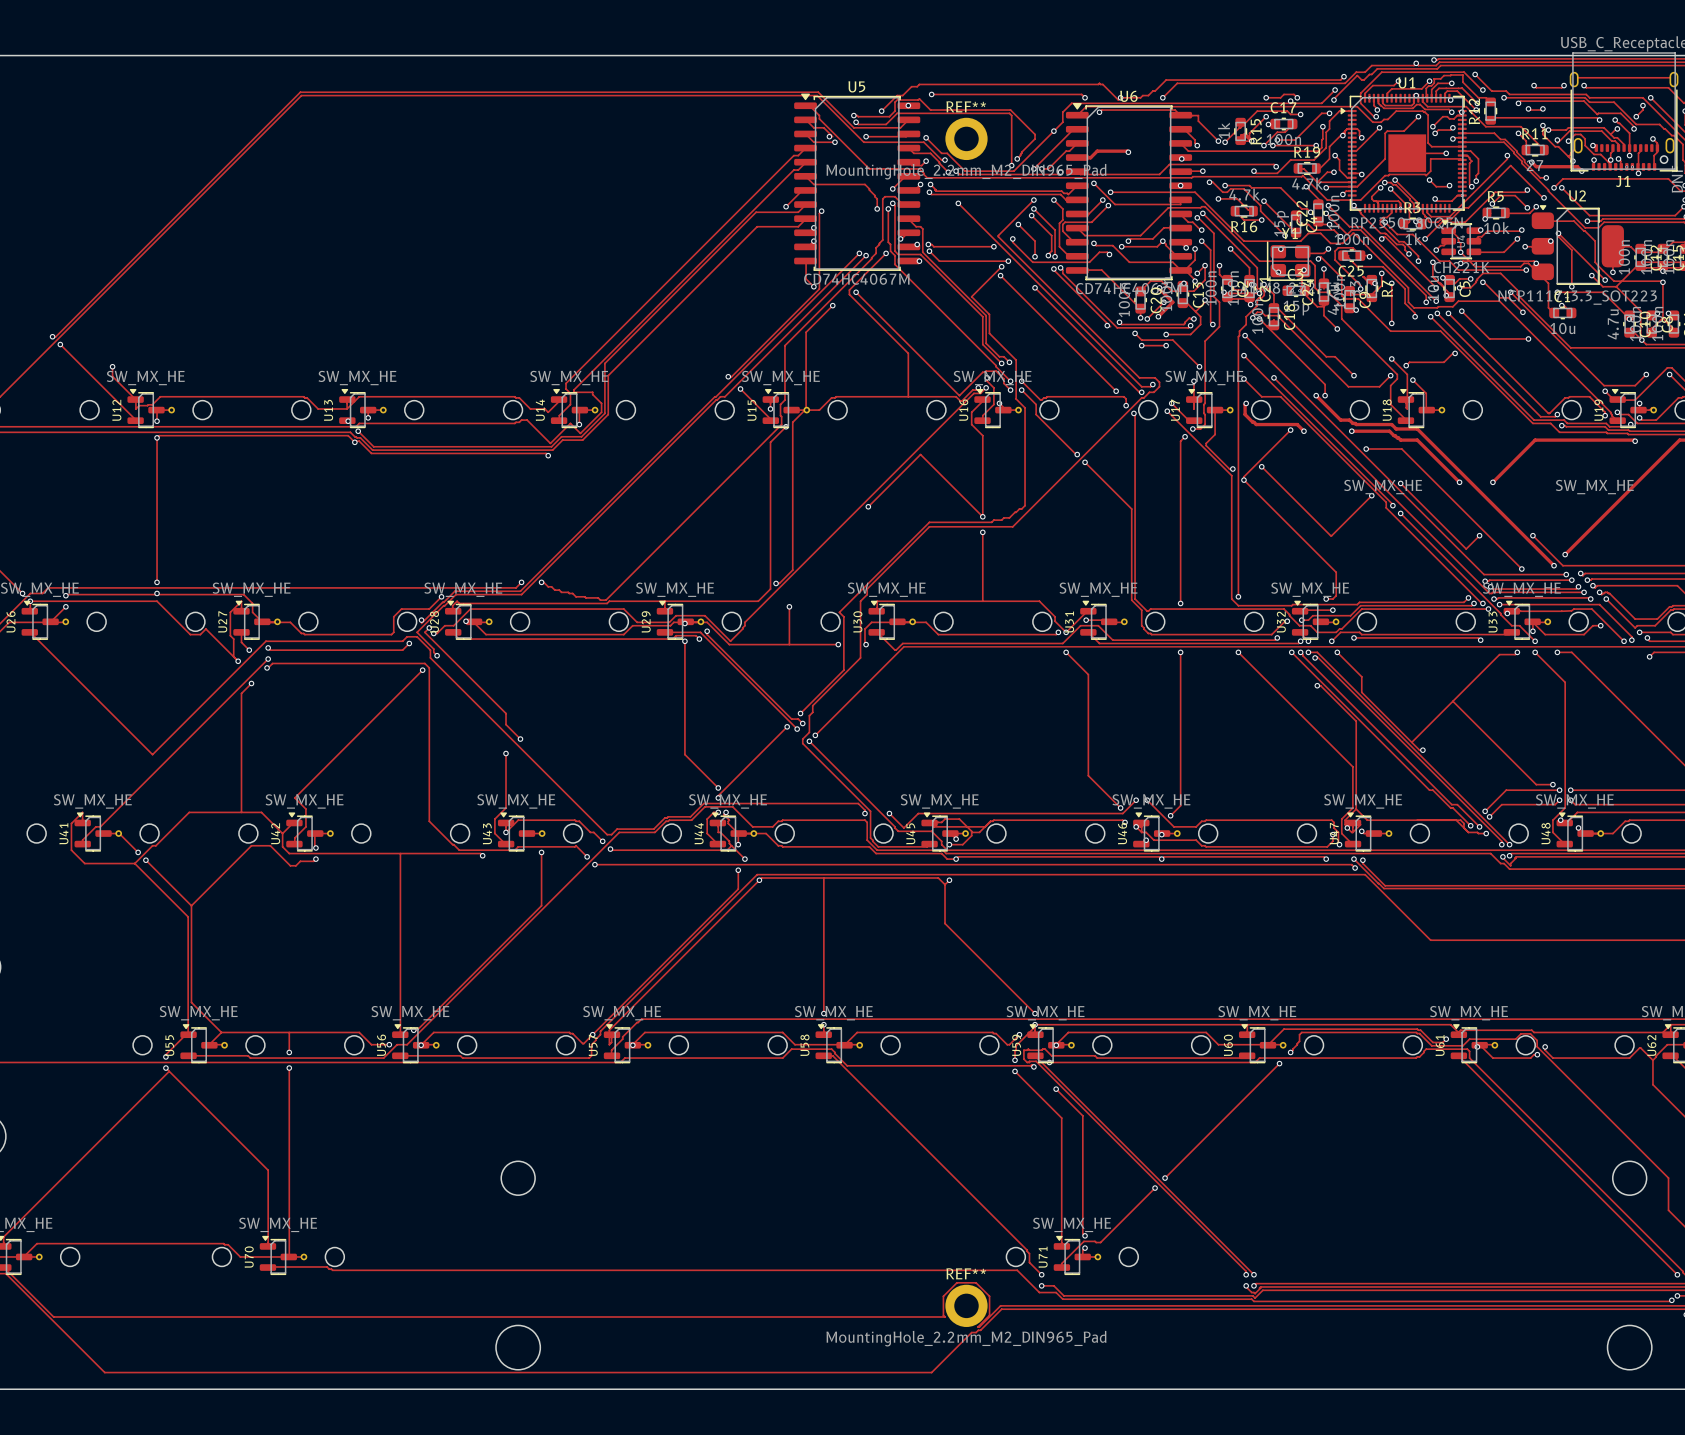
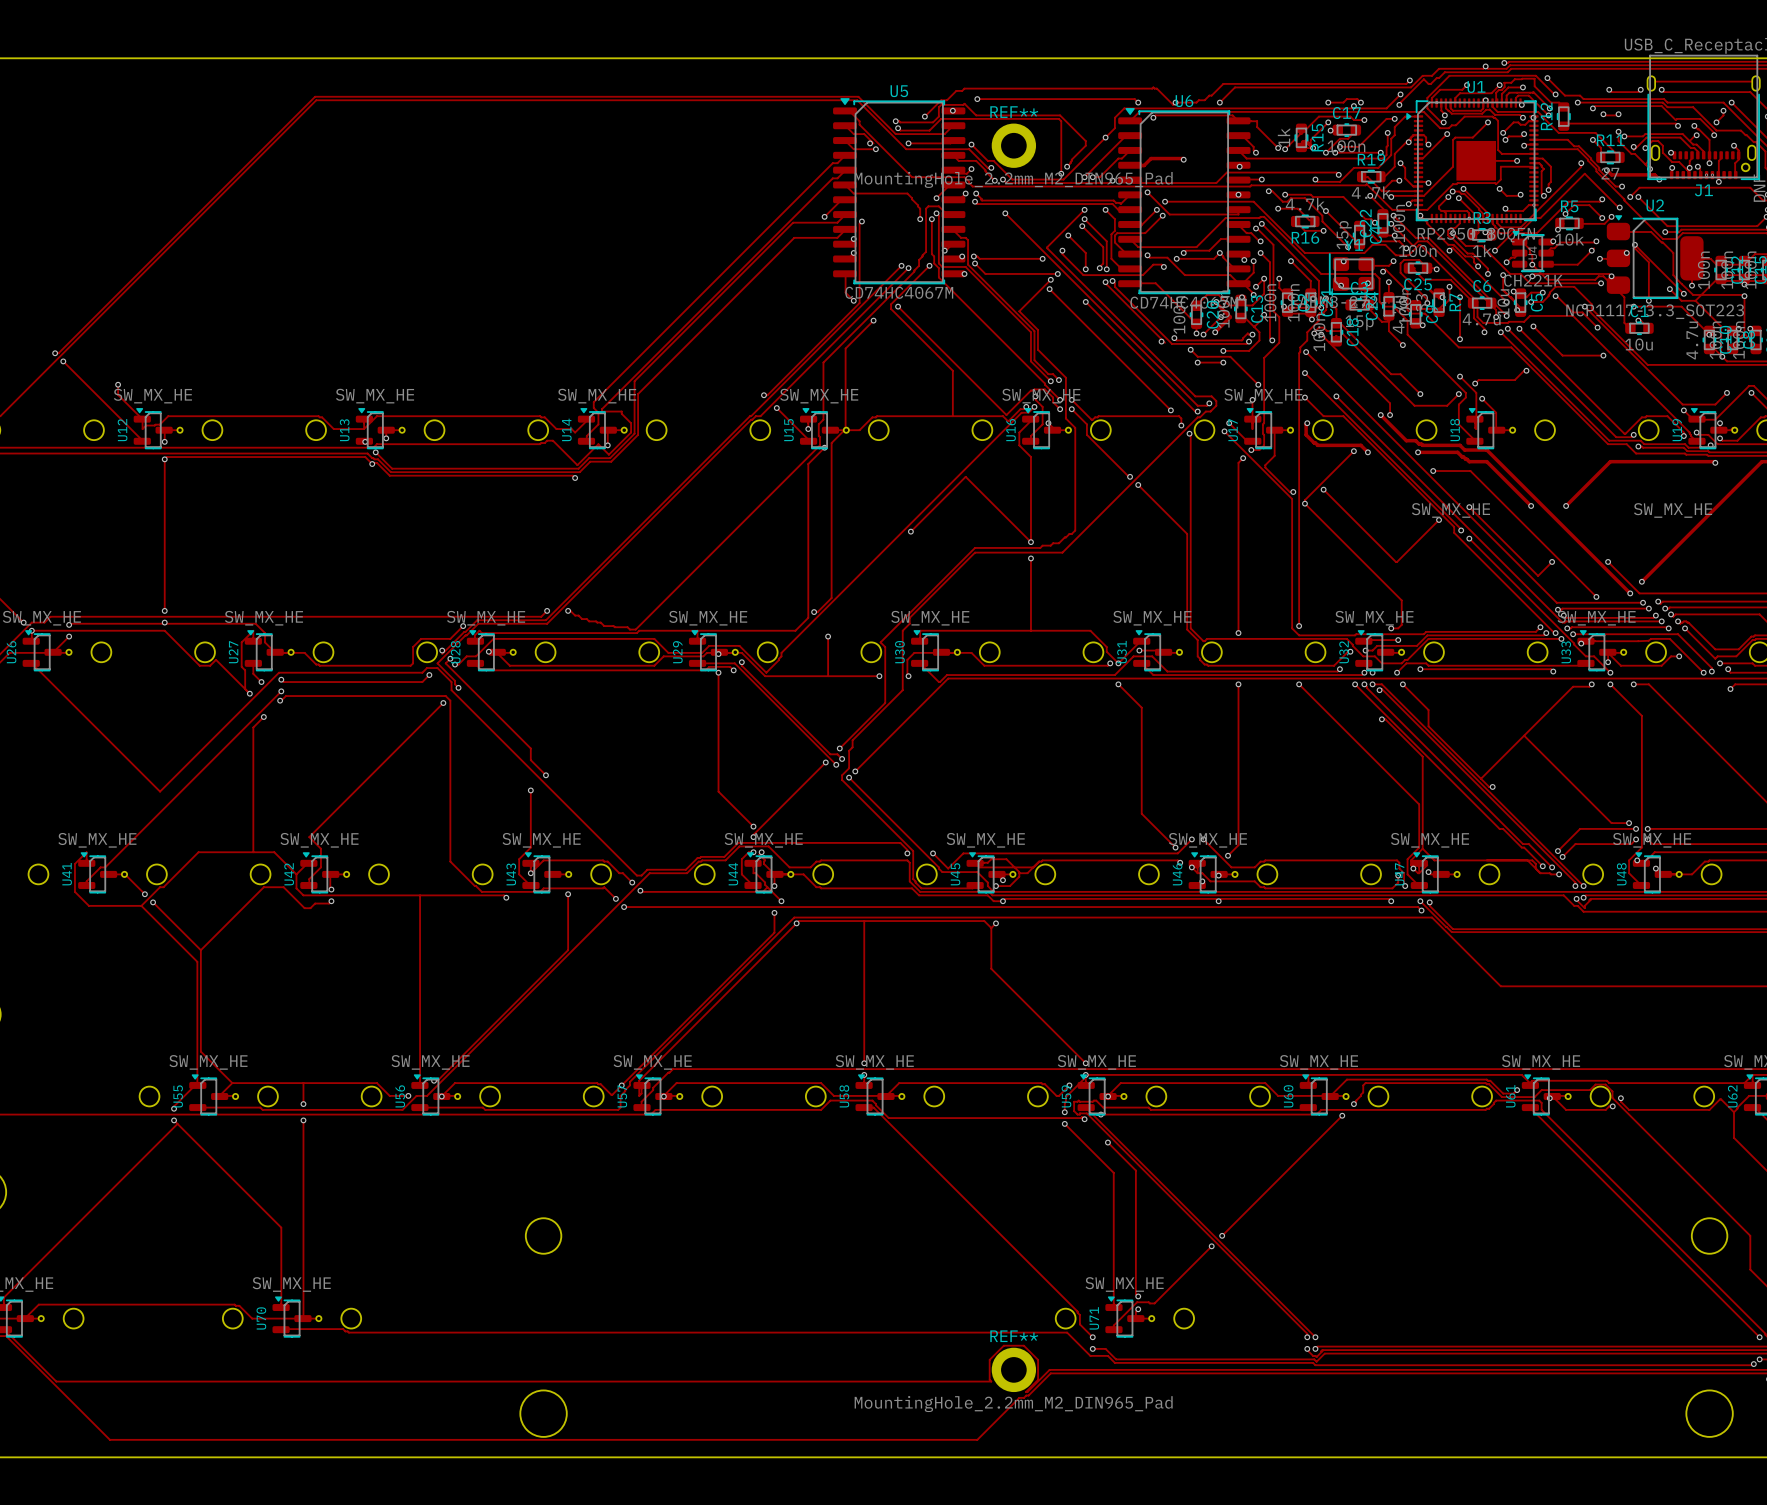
C6: none -> 4.7u (1482, 303)

